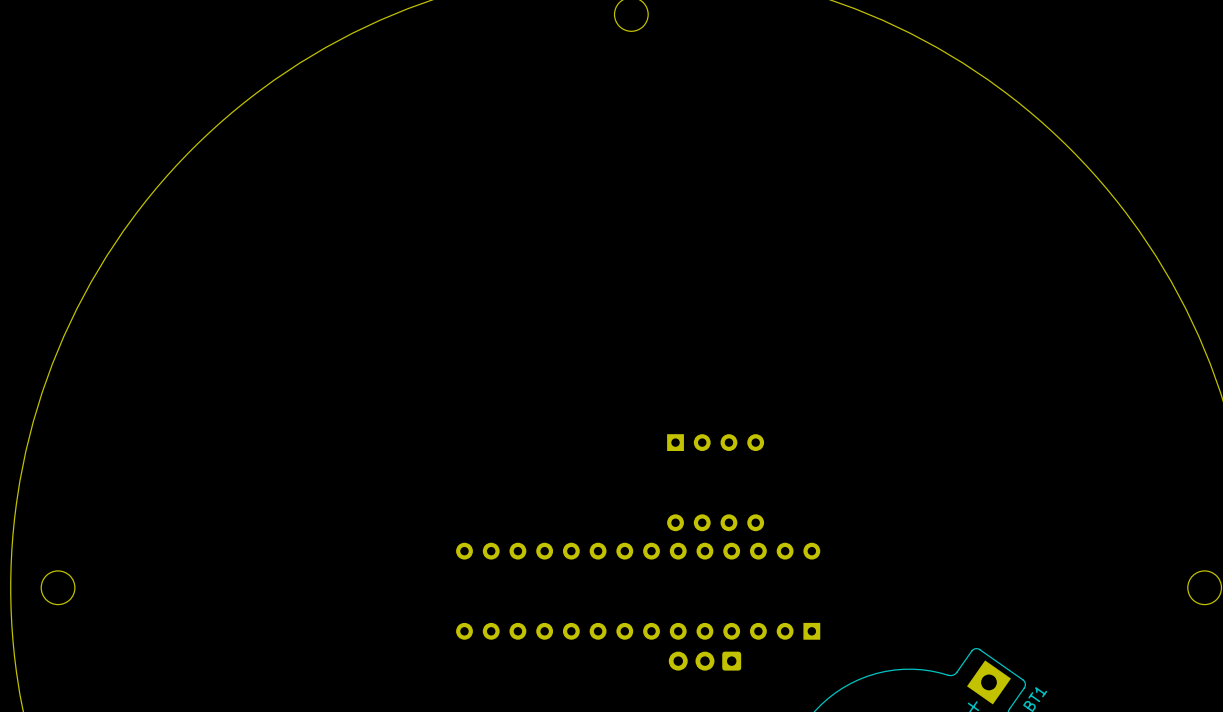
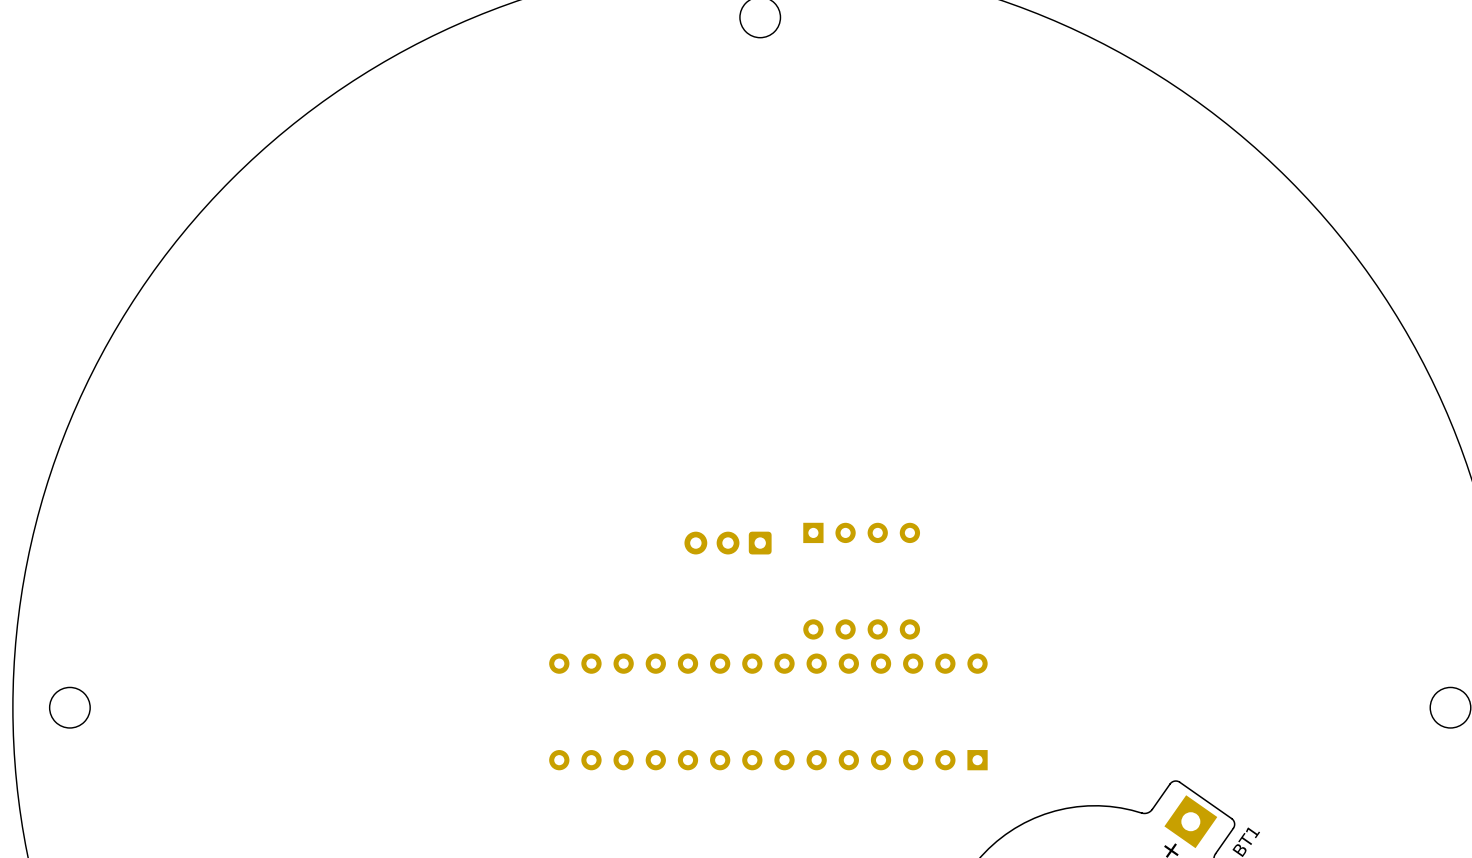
part position: (704, 661) -> (728, 543)

